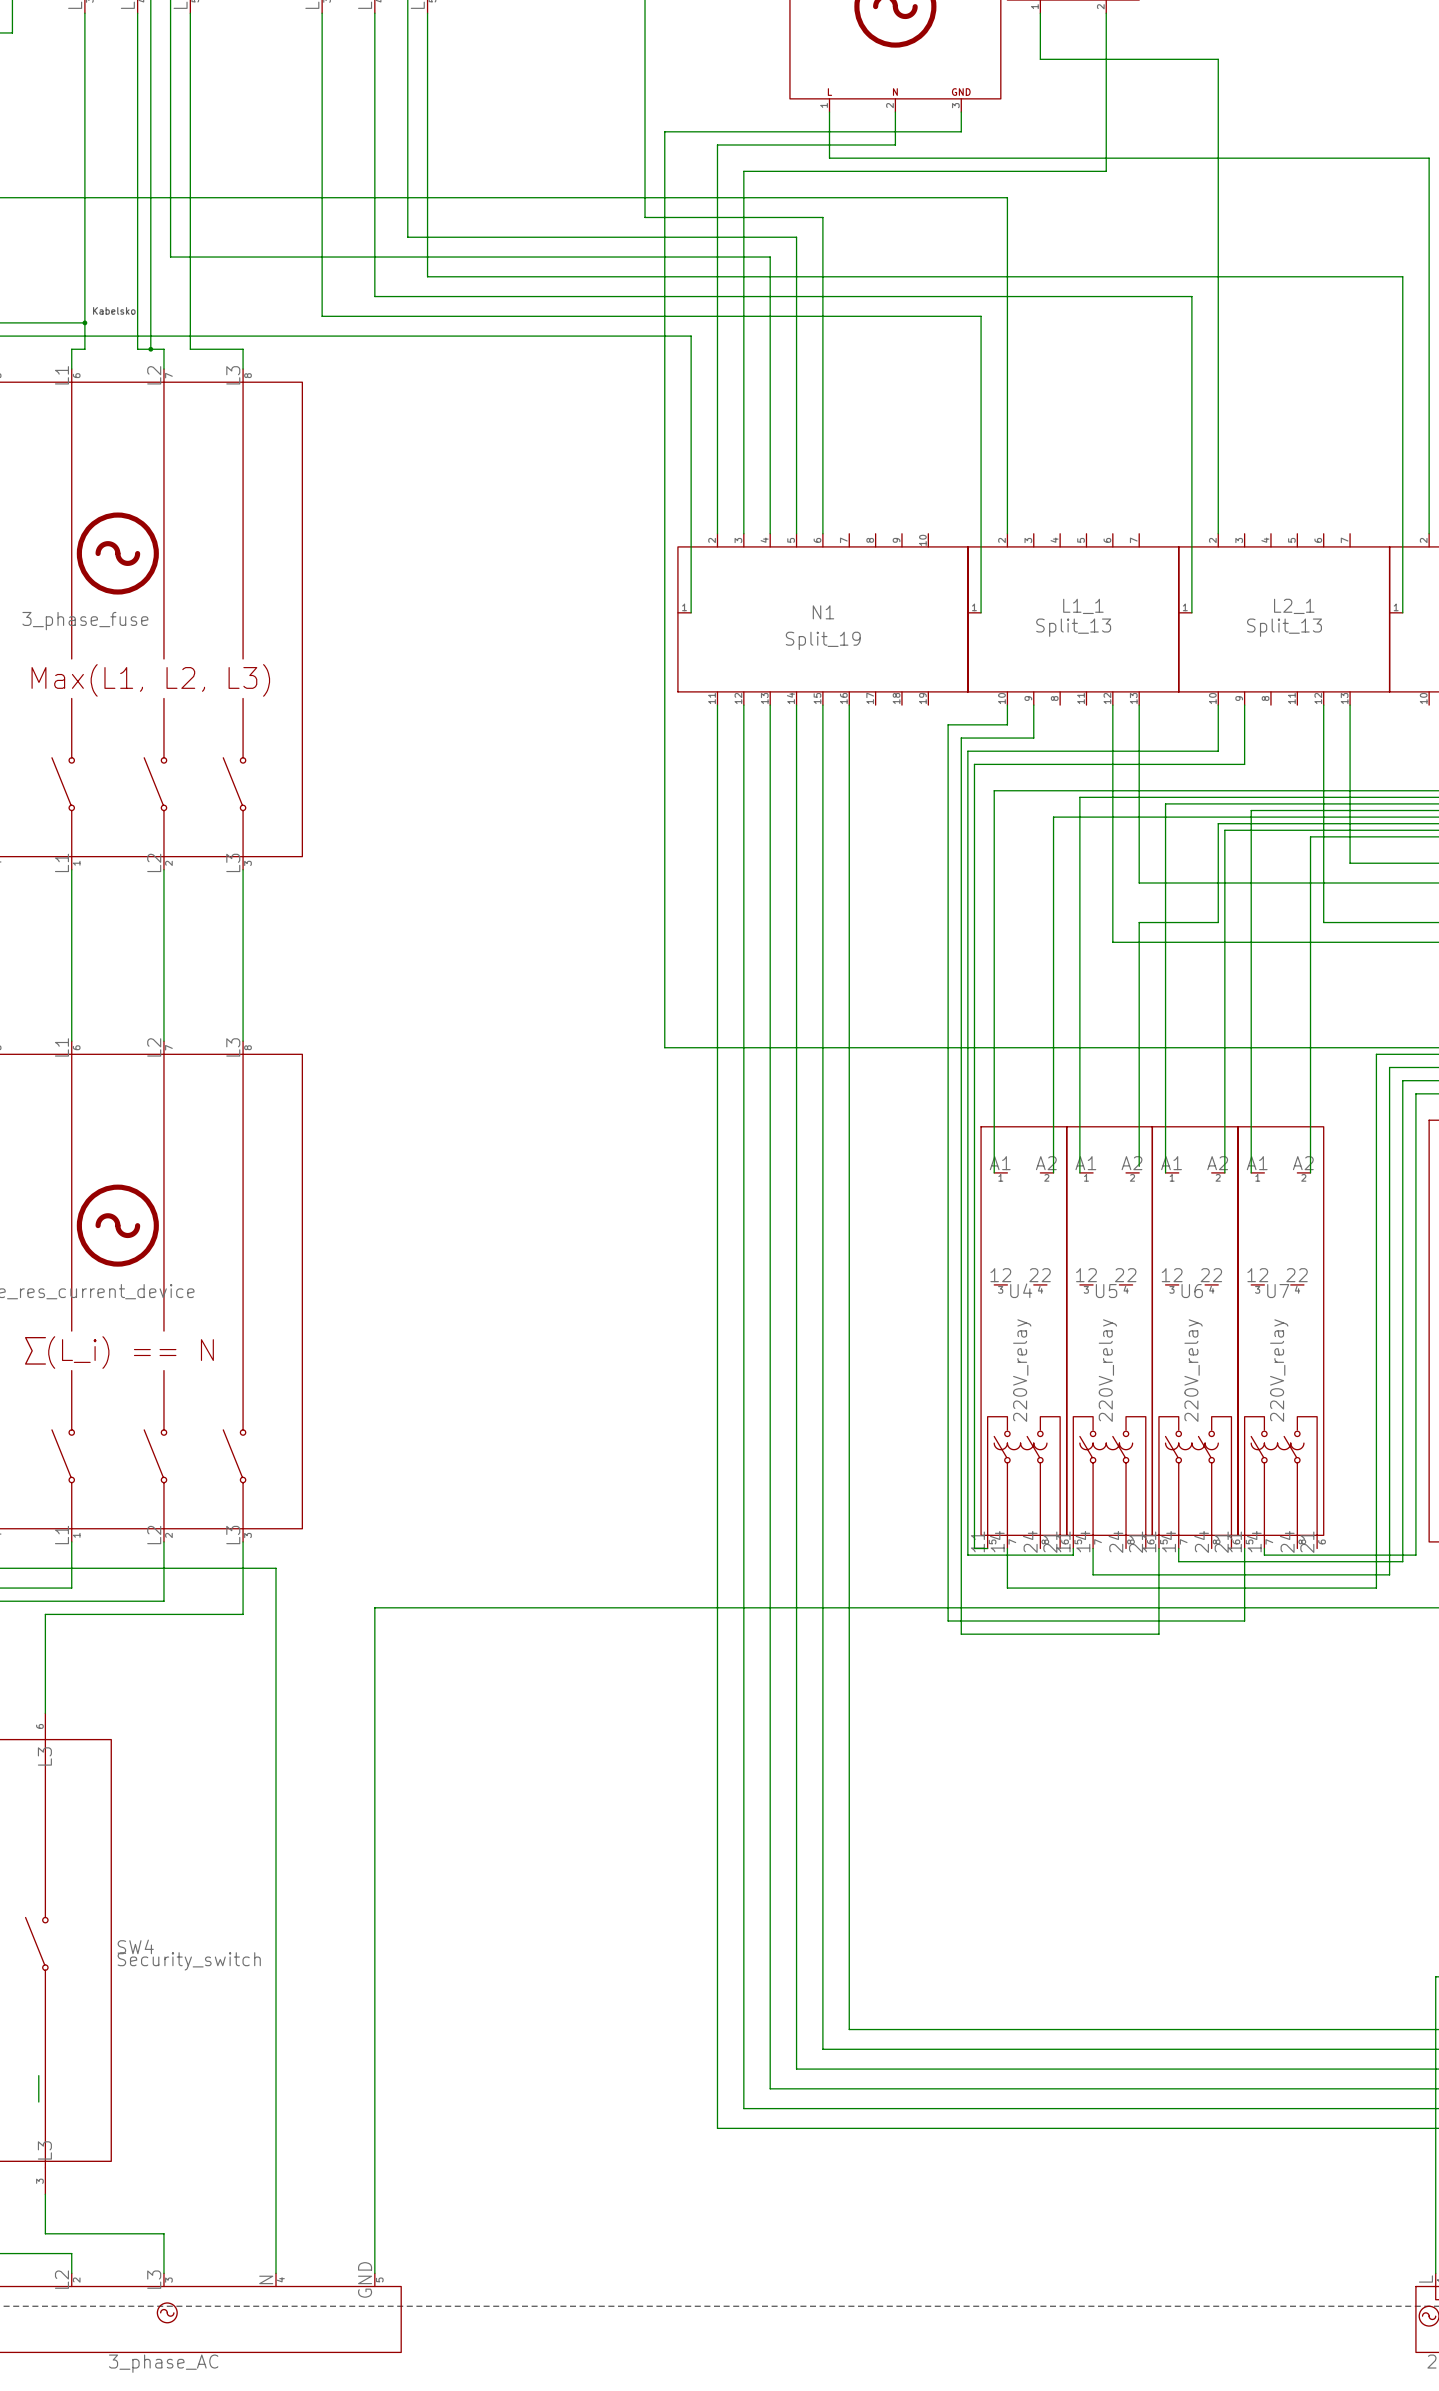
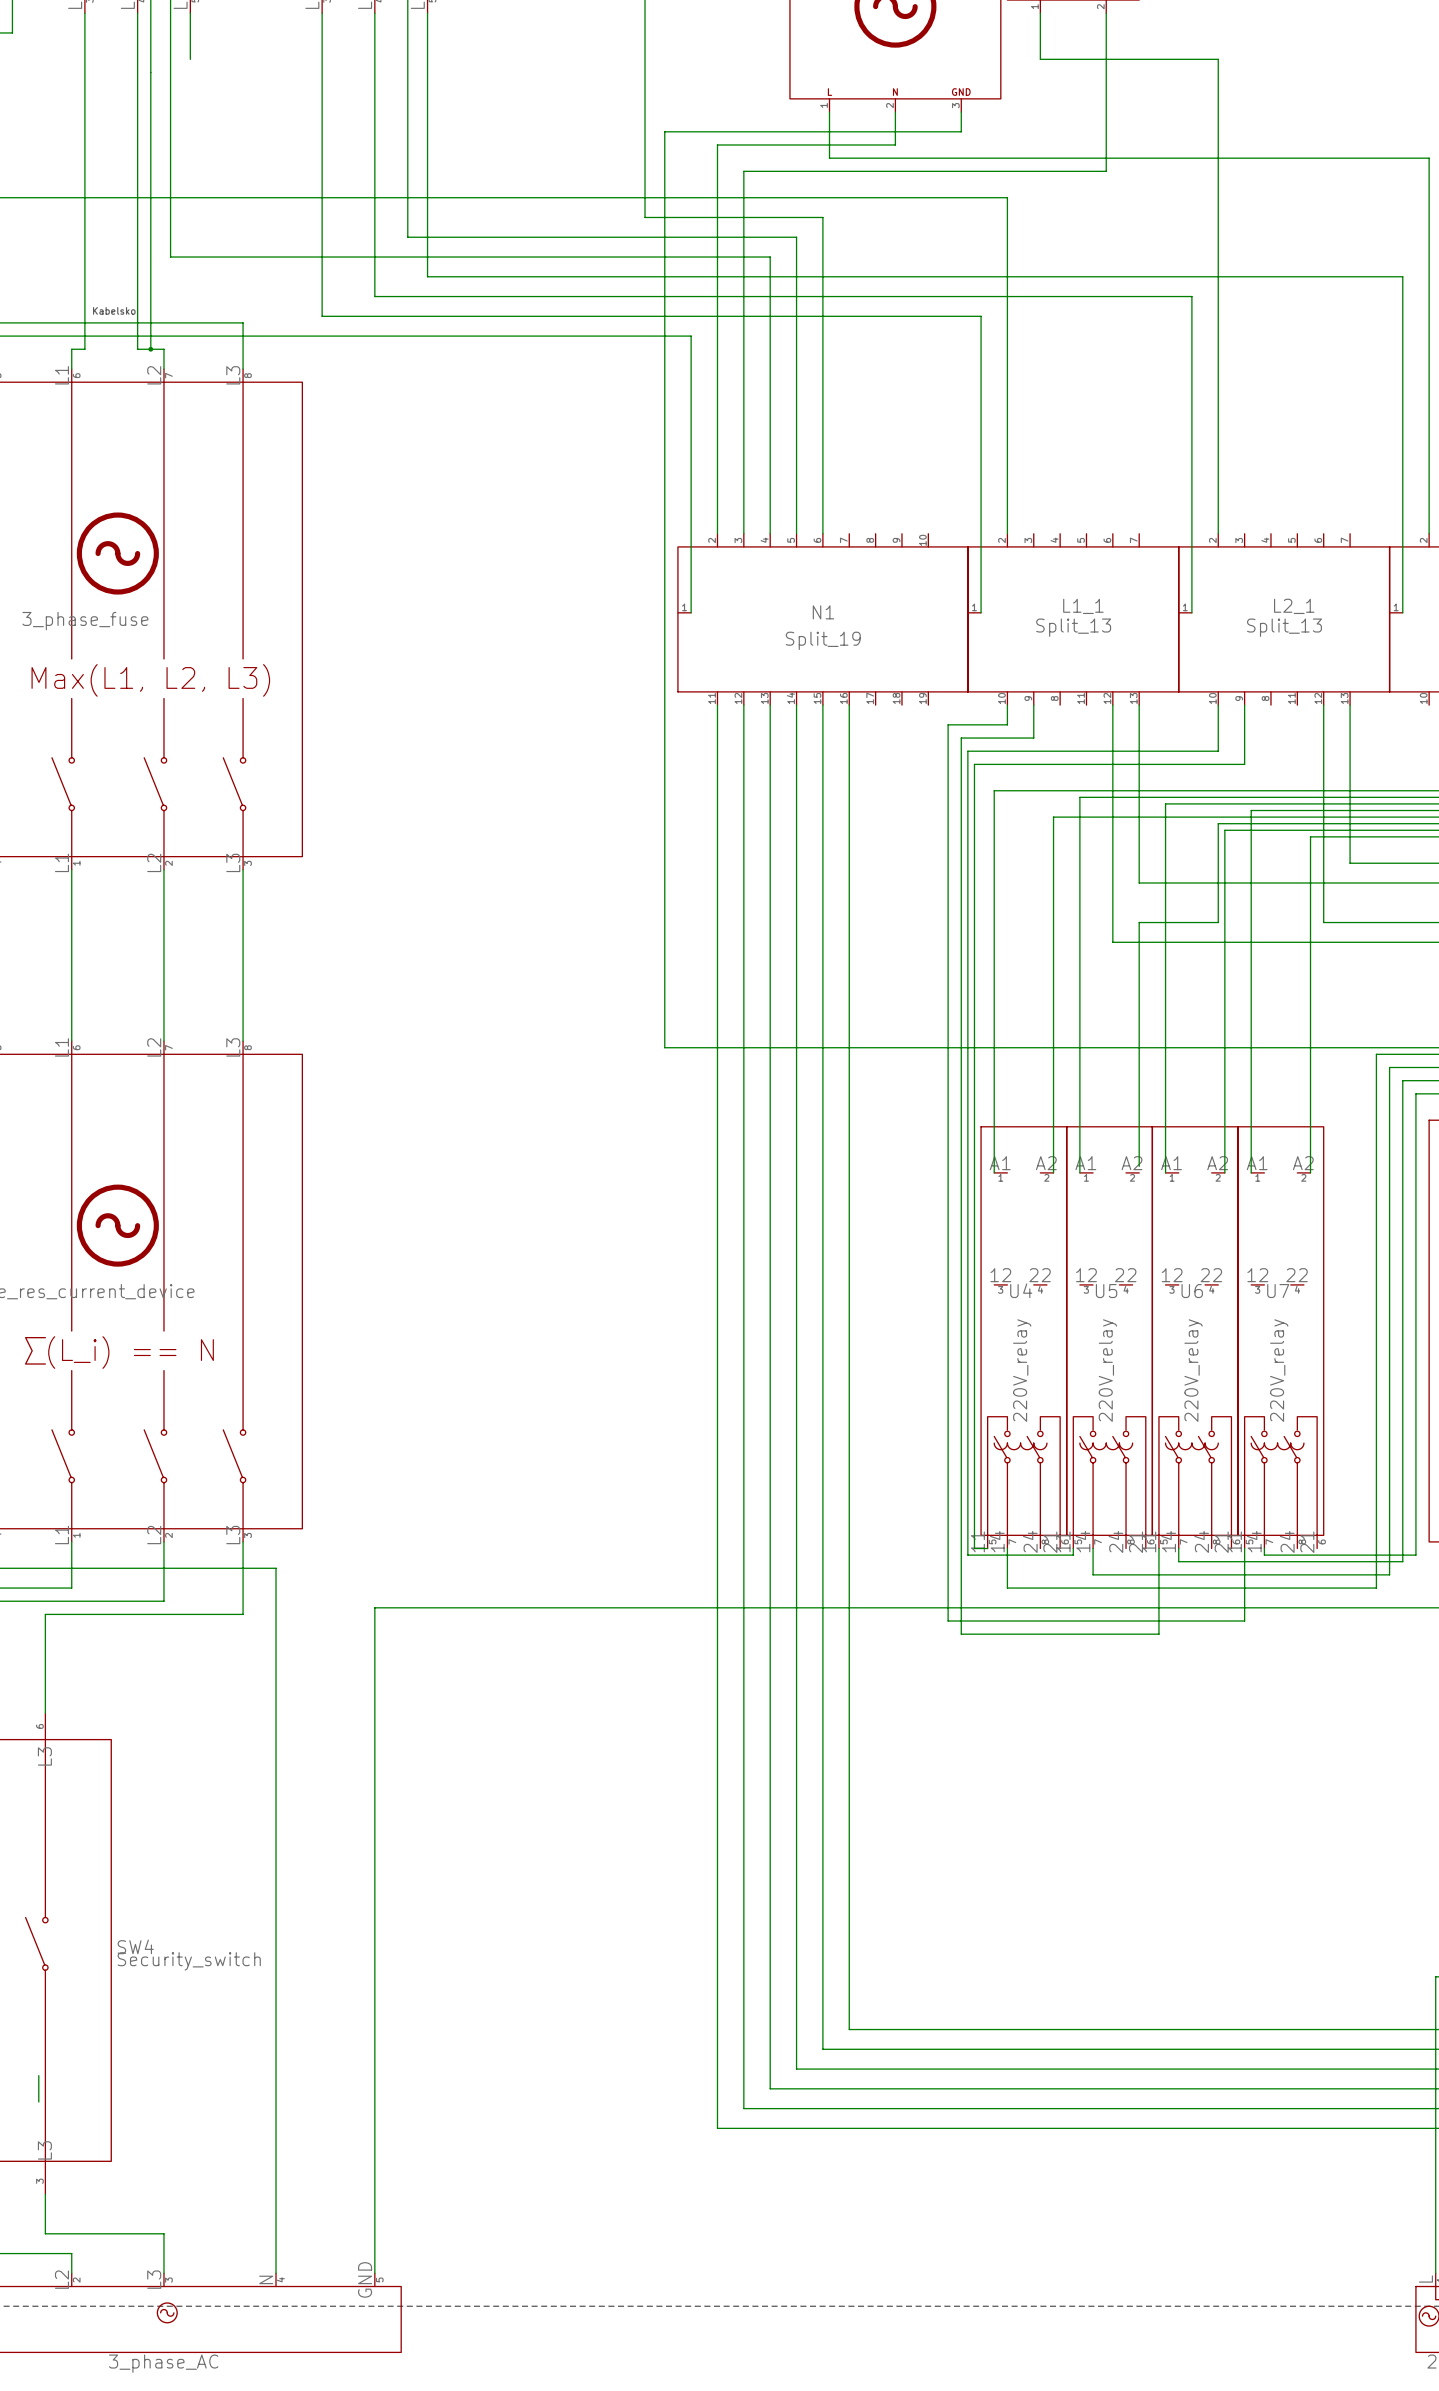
wire: (190, 59) (190, 349) (243, 349) -> (84, 322) (243, 322) (243, 349)
junction: (84, 322) -> none

